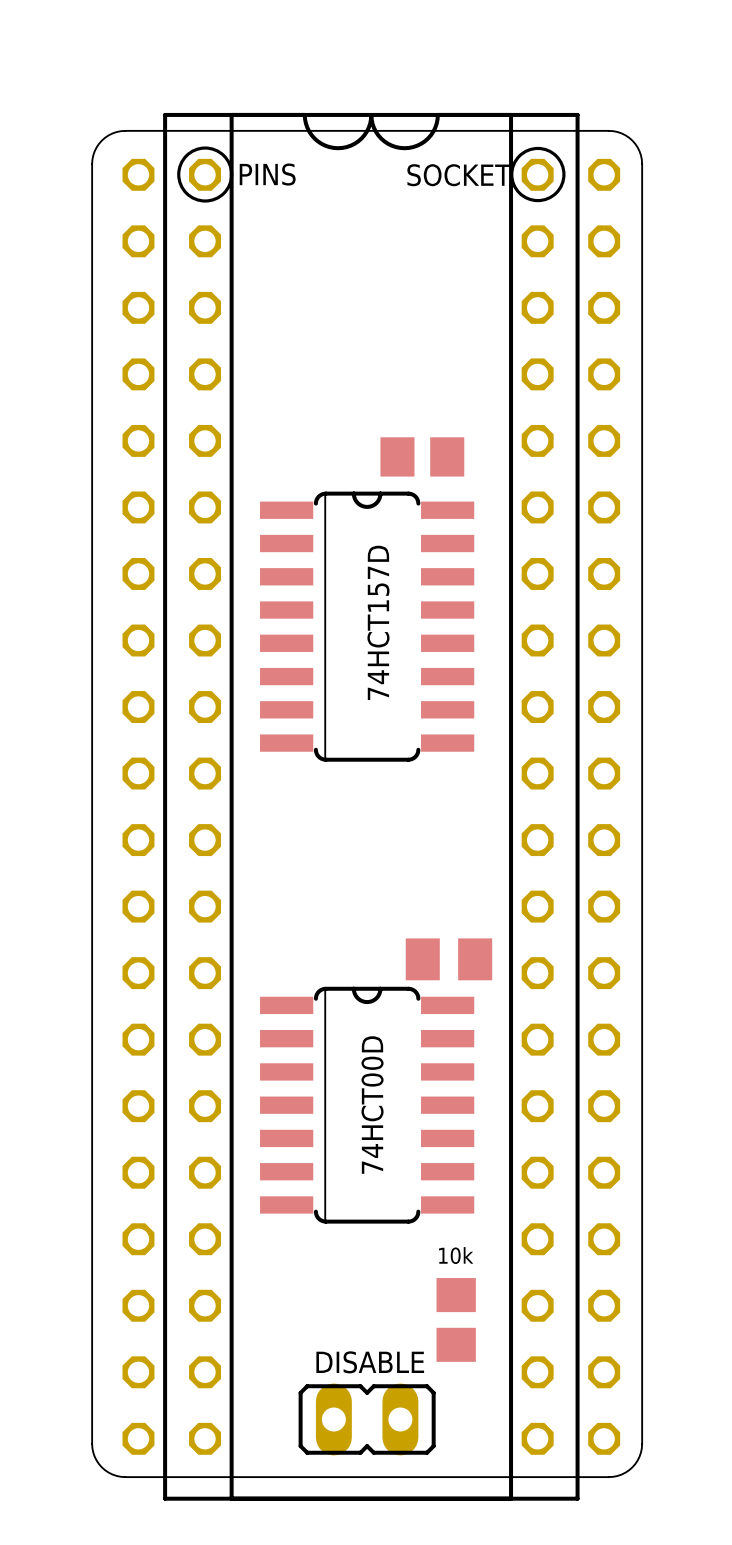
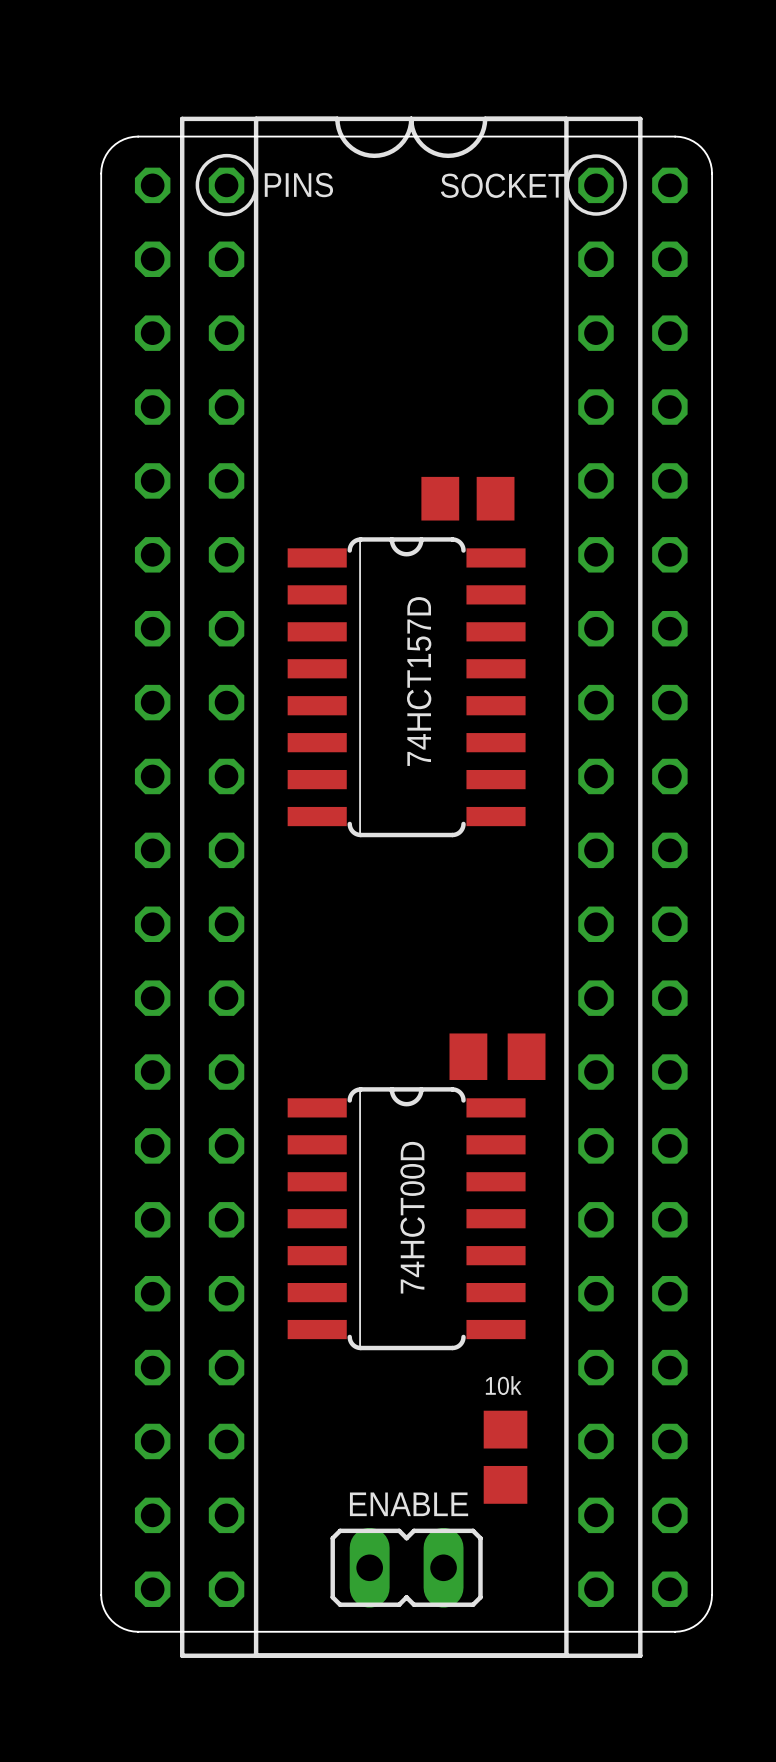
DISABLE name: DISABLE (370, 1362) -> ENABLE (409, 1504)

